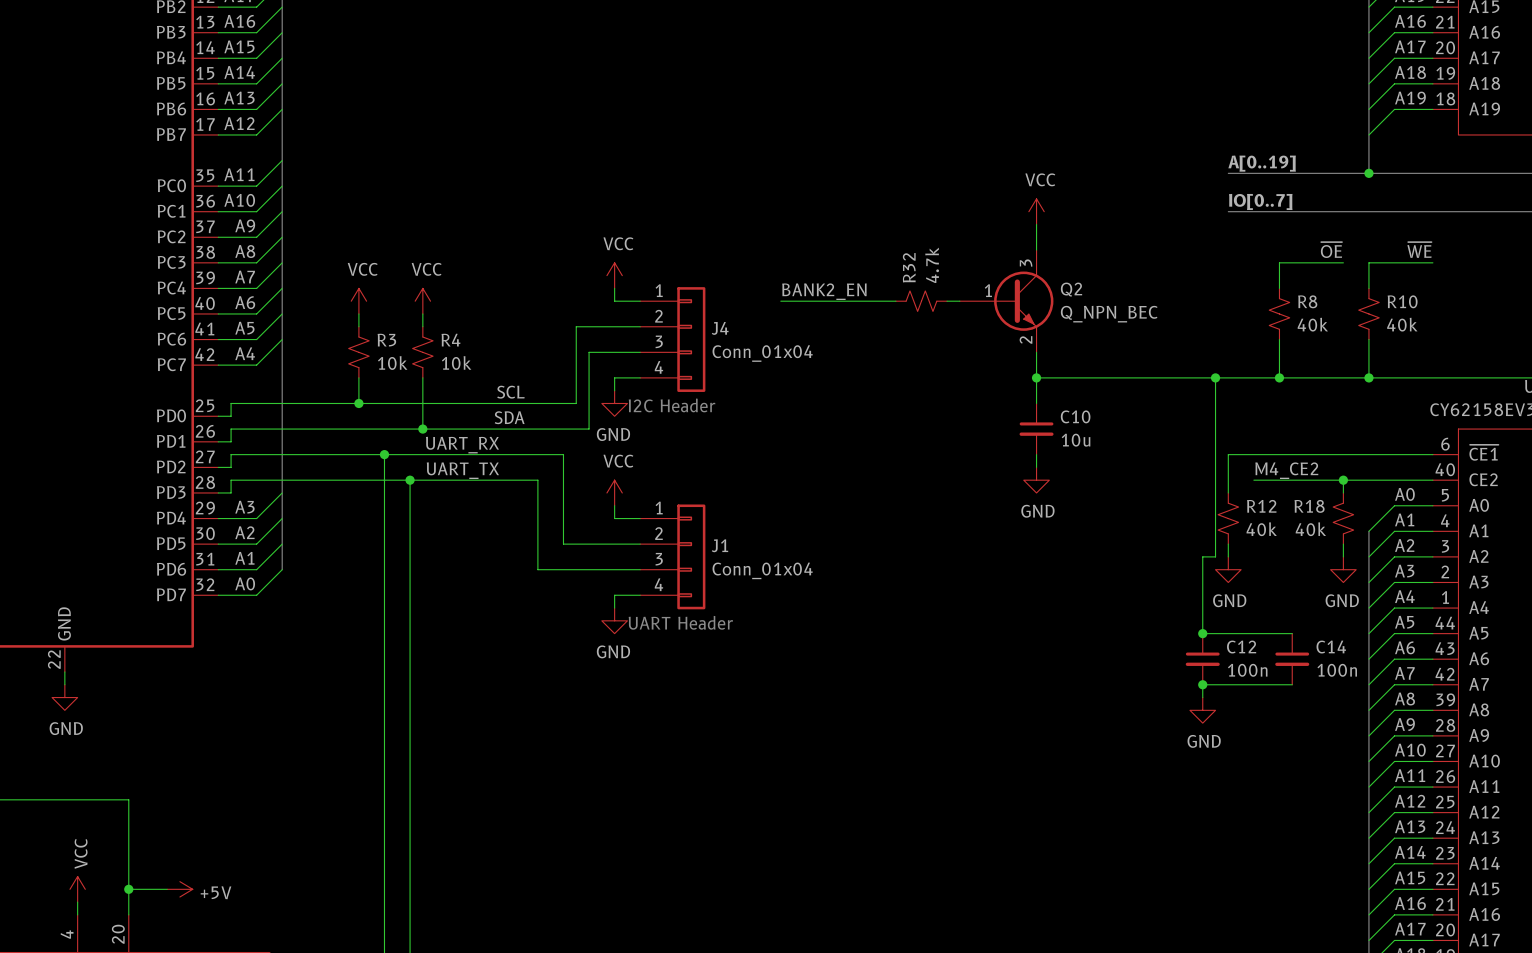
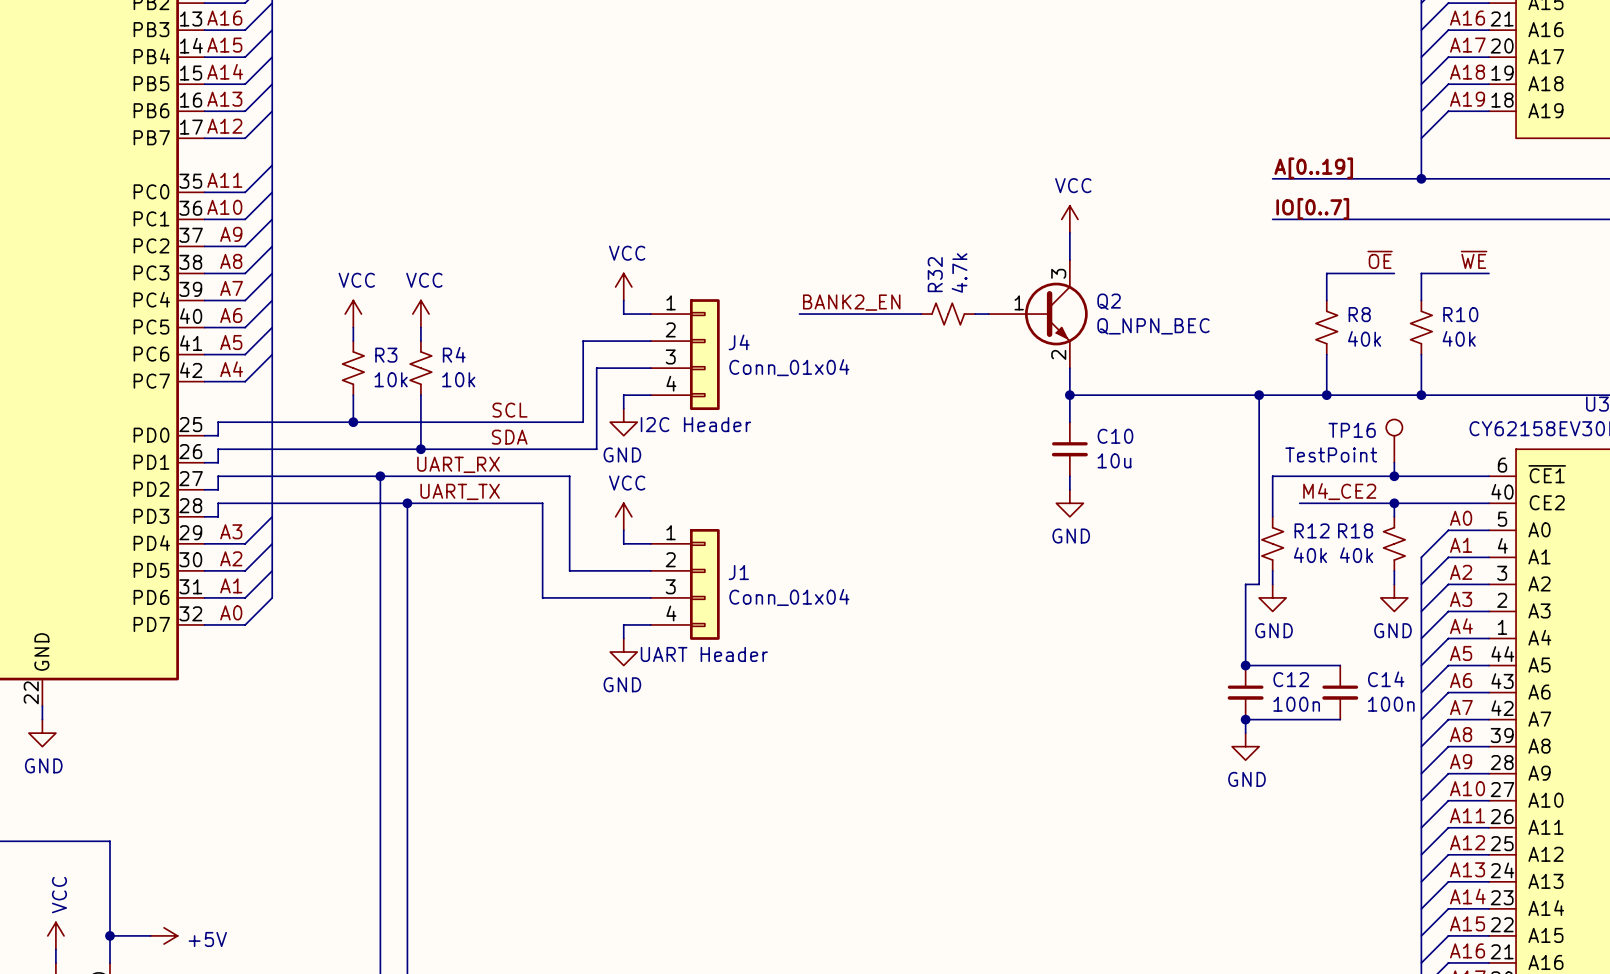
TP16: none -> TestPoint (1394, 441)
wire: none -> (1394, 462) (1394, 476)
junction: none -> (1394, 476)

